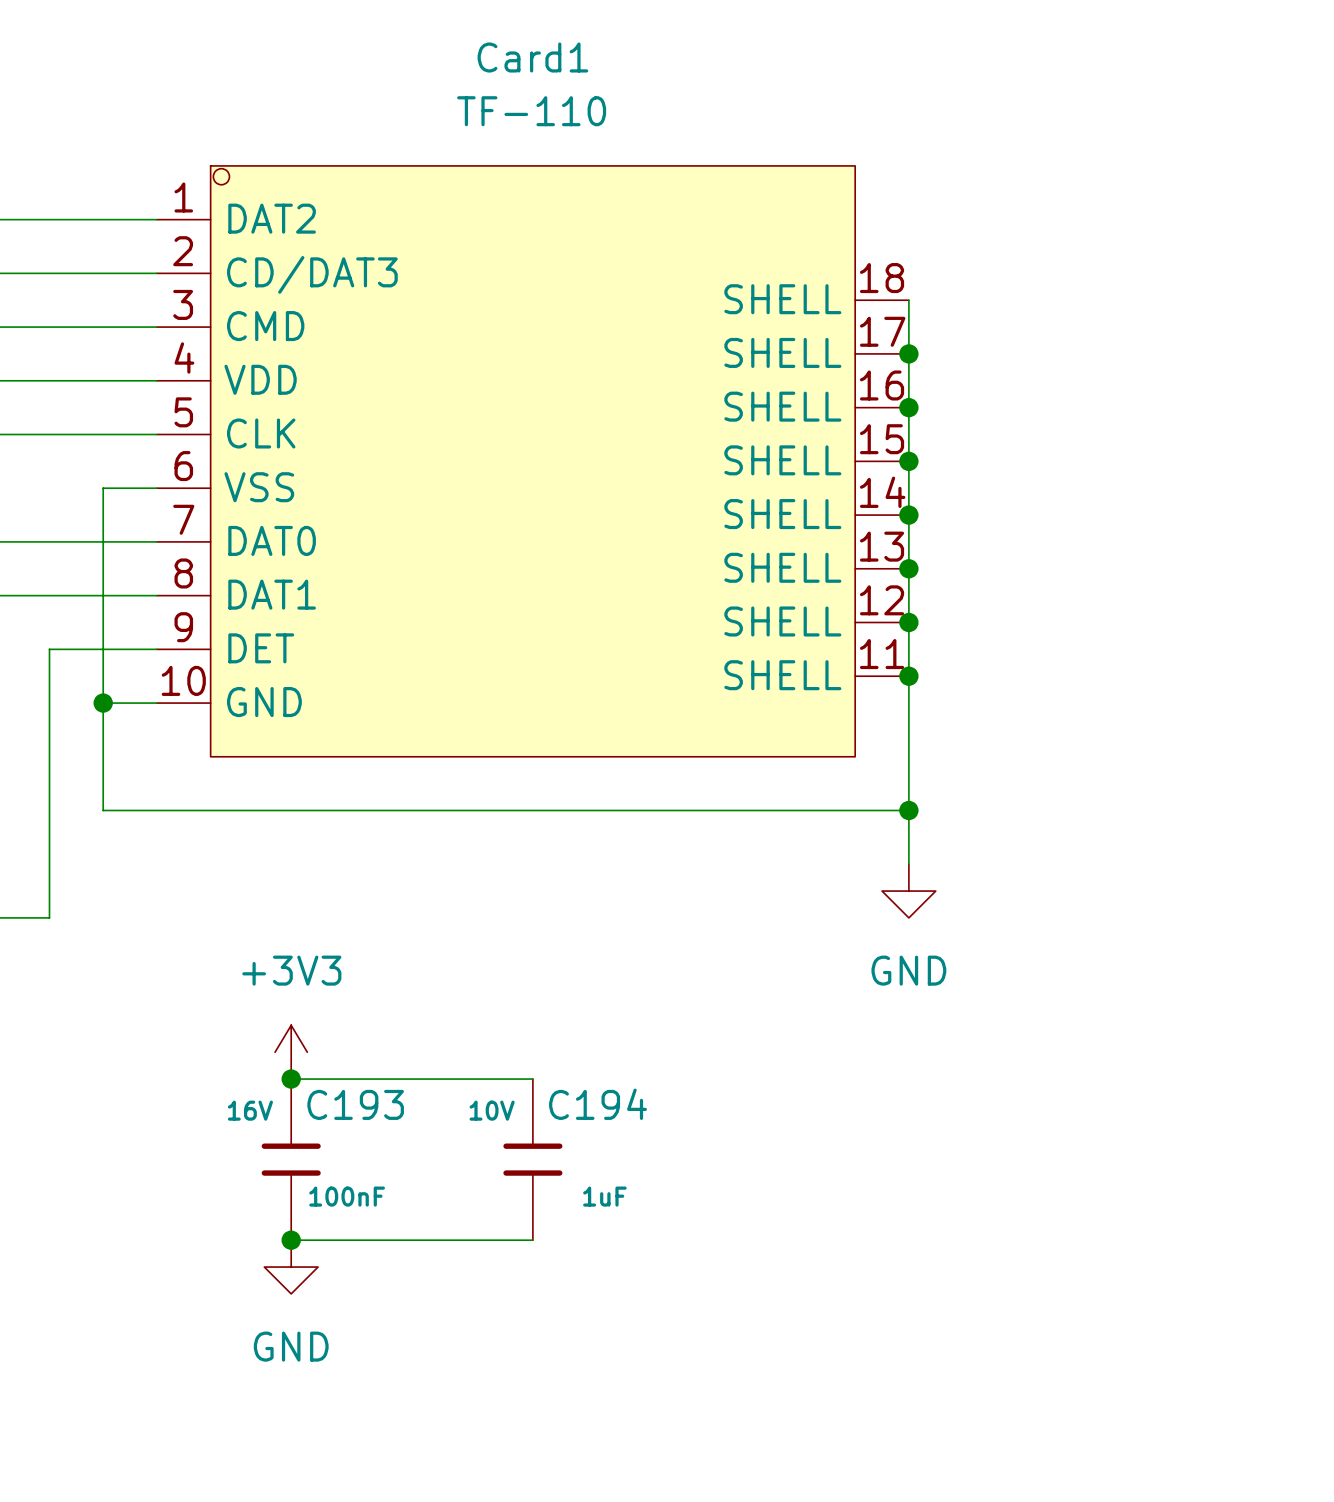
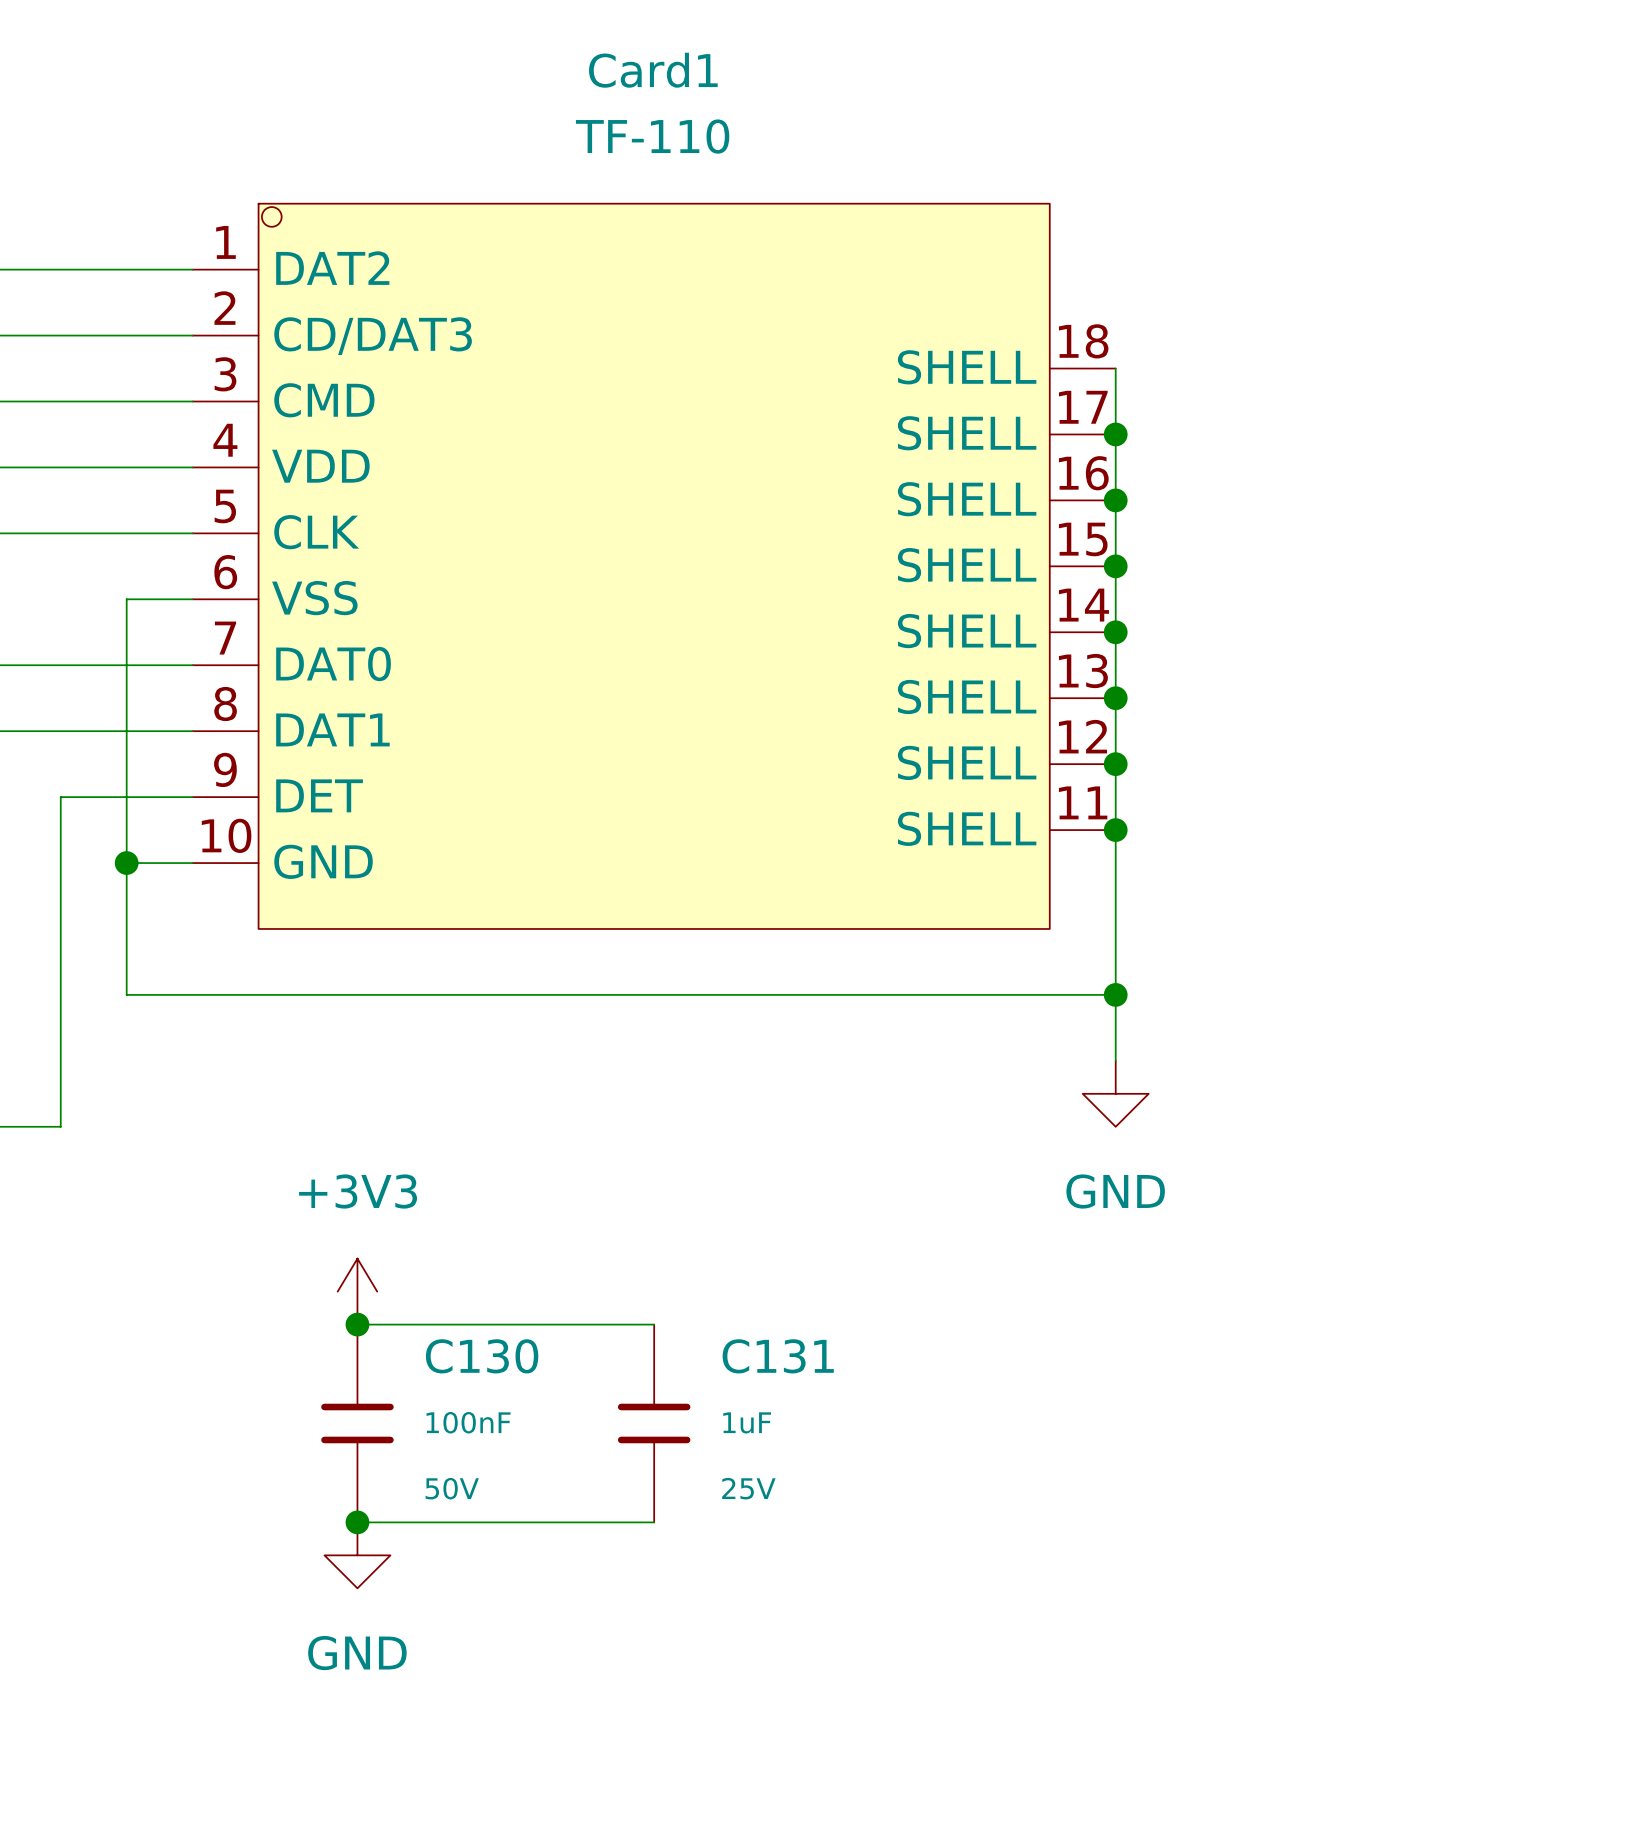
C193 name: C193 (355, 1104) -> C130 (482, 1356)
C194 name: C194 (598, 1104) -> C131 (778, 1356)
C193 text: 16V (250, 1110) -> 50V (452, 1488)
C194 text: 10V (492, 1110) -> 25V (748, 1488)
C193 value position: 100nF (347, 1196) -> 100nF (468, 1422)
C194 value position: 1uF (604, 1196) -> 1uF (747, 1422)

